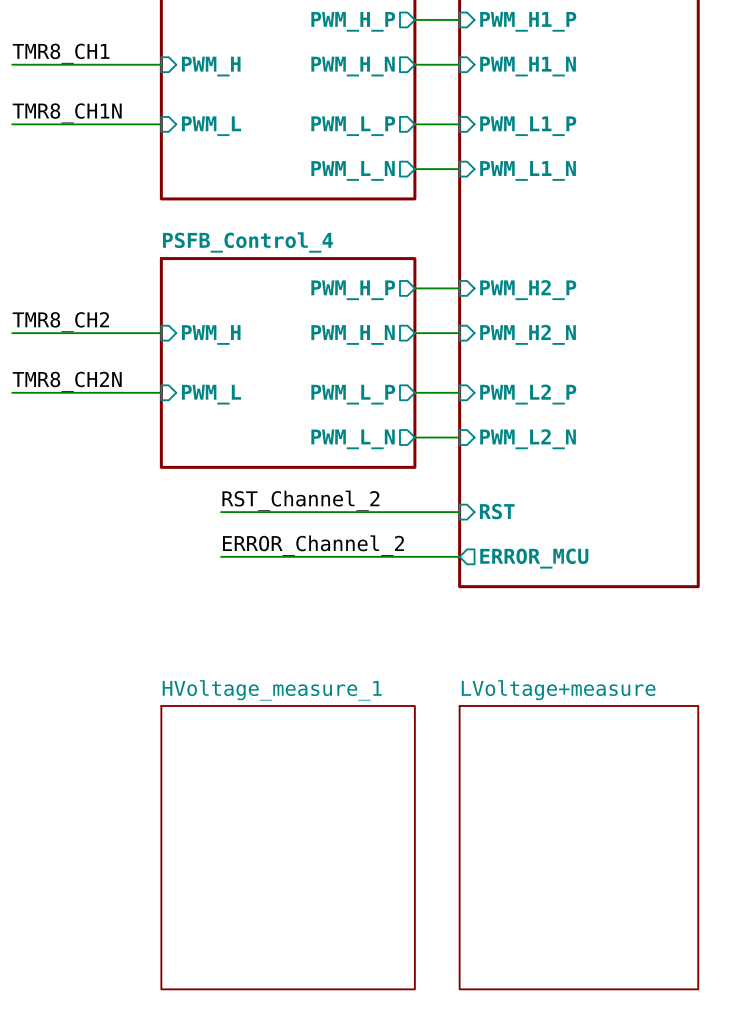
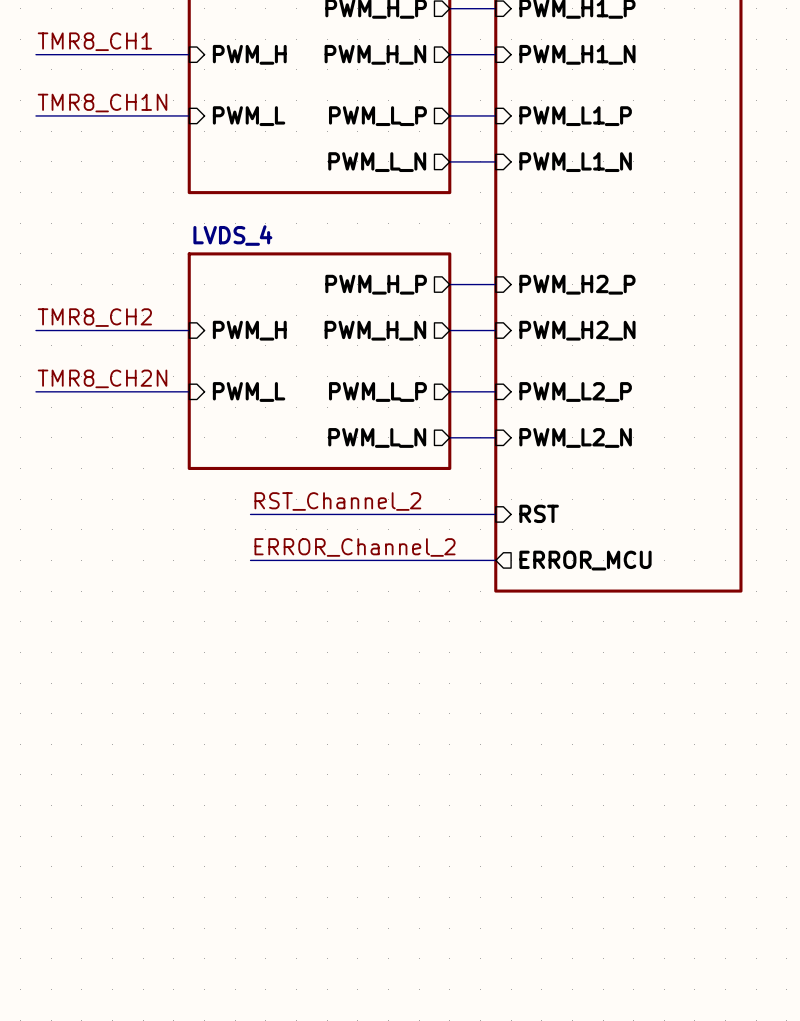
sheet PSFB_Control_4 name: PSFB_Control_4 (247, 242) -> LVDS_4 (232, 235)
sheet HVoltage_measure_1: (288, 847) -> none
sheet LVoltage+measure: (578, 847) -> none

